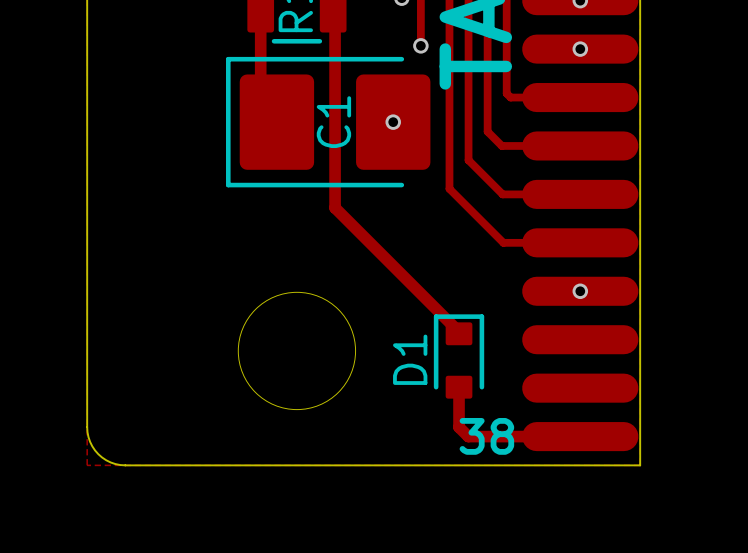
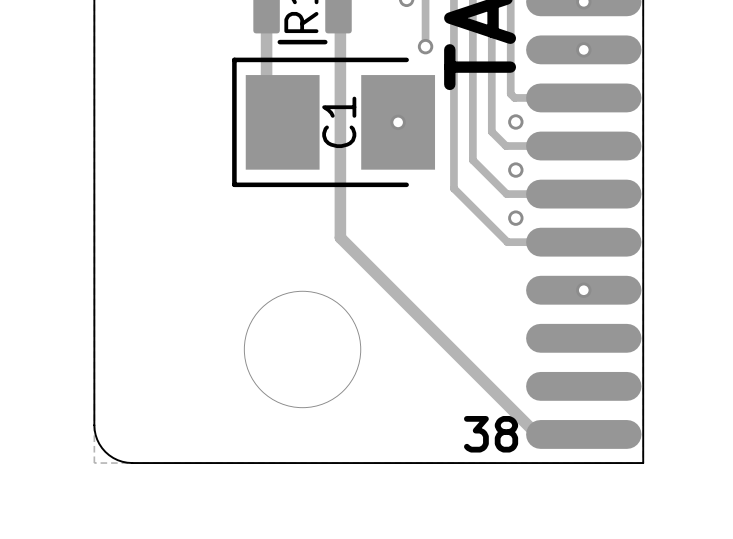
C1 footprint: [226, 56, 431, 188] -> [232, 57, 436, 188]
via: none -> (515, 121)
via: none -> (515, 170)
track: (335, 207) (459, 333) -> (340, 207) (340, 237) (537, 434)
via: none -> (515, 218)
D1: (459, 356) -> none
track: (459, 387) (459, 427) (468, 436) (533, 436) -> none

